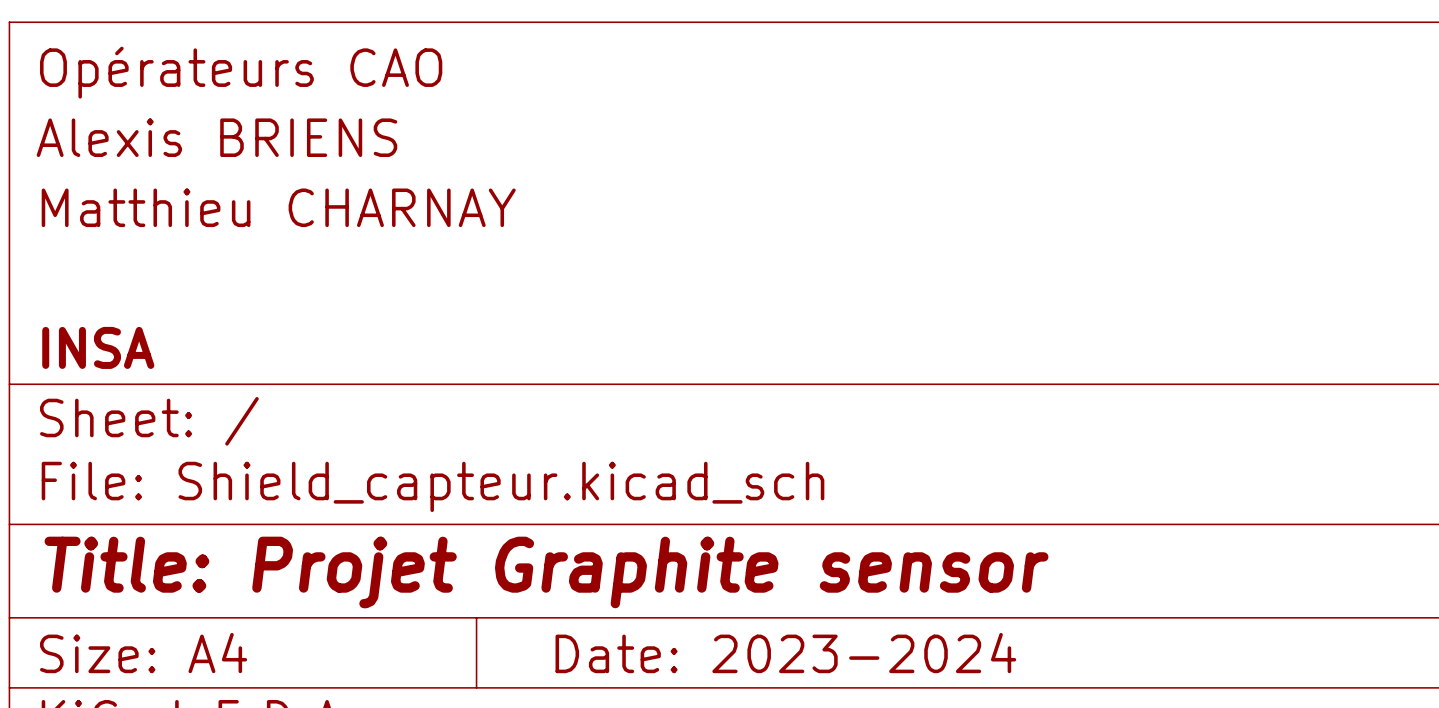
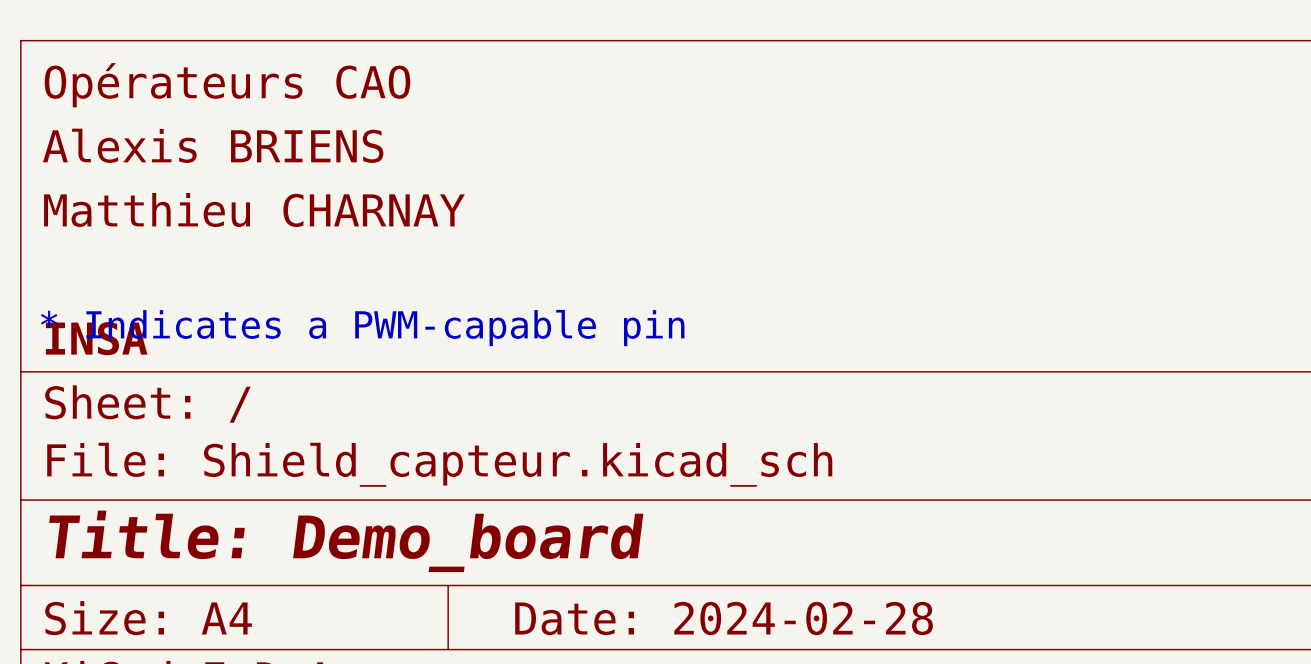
text: none -> * Indicates a PWM-capable pin (362, 328)
title block: Title: Projet Graphite sensor (546, 572) -> Title: Demo_board (346, 541)
title block: Date: 2023-2024 (785, 653) -> Date: 2024-02-28 (724, 618)

